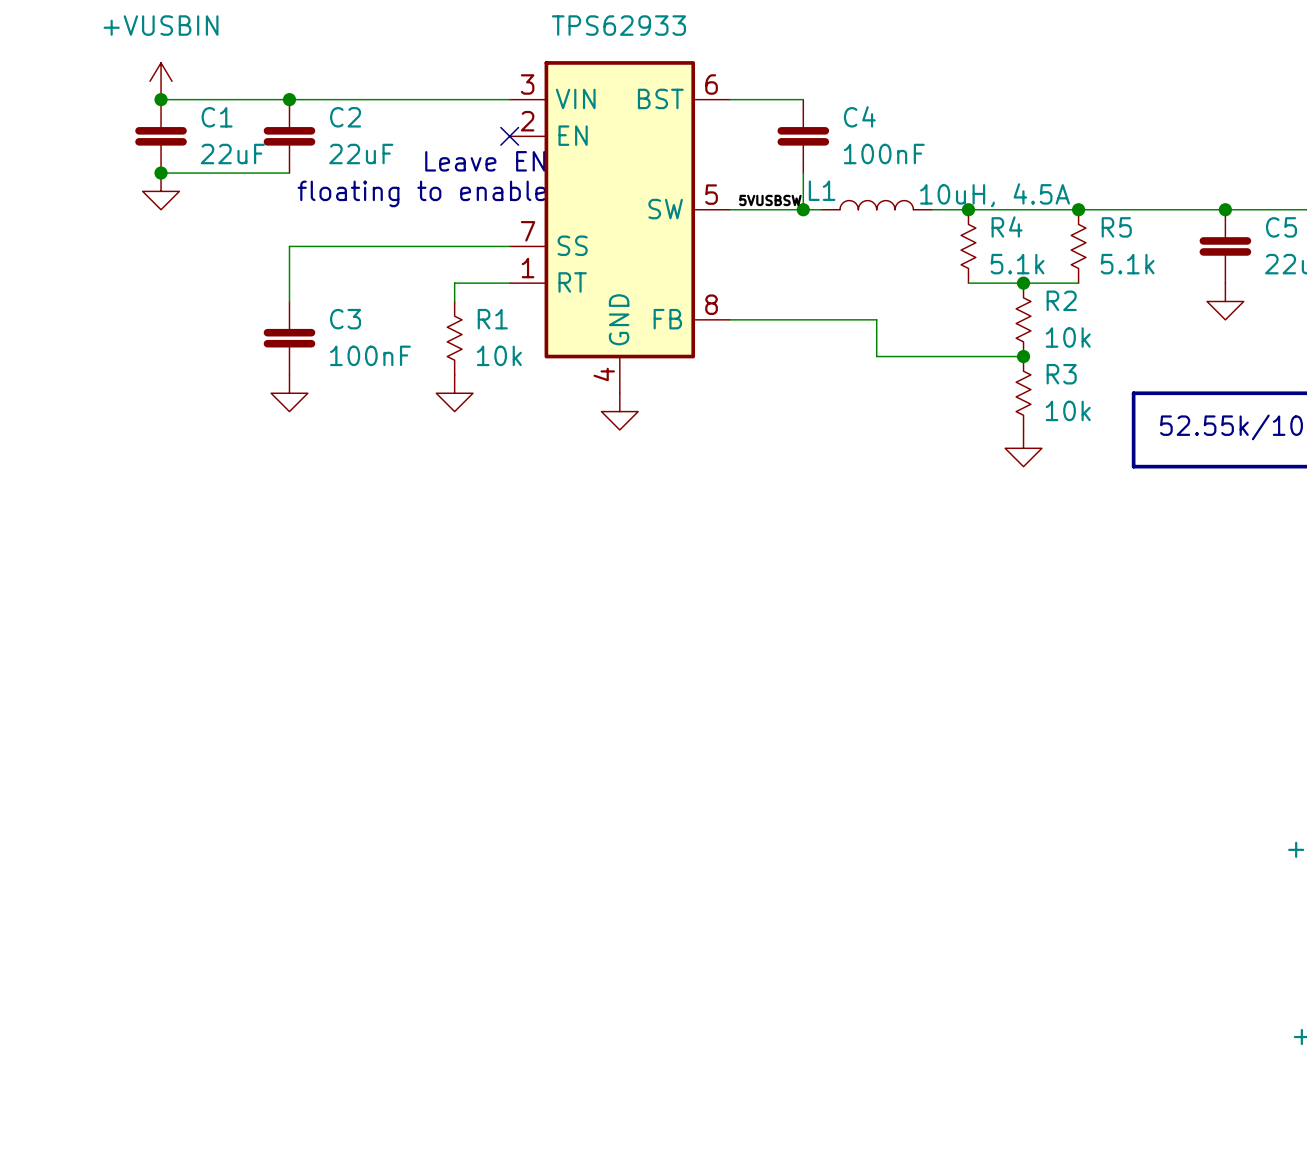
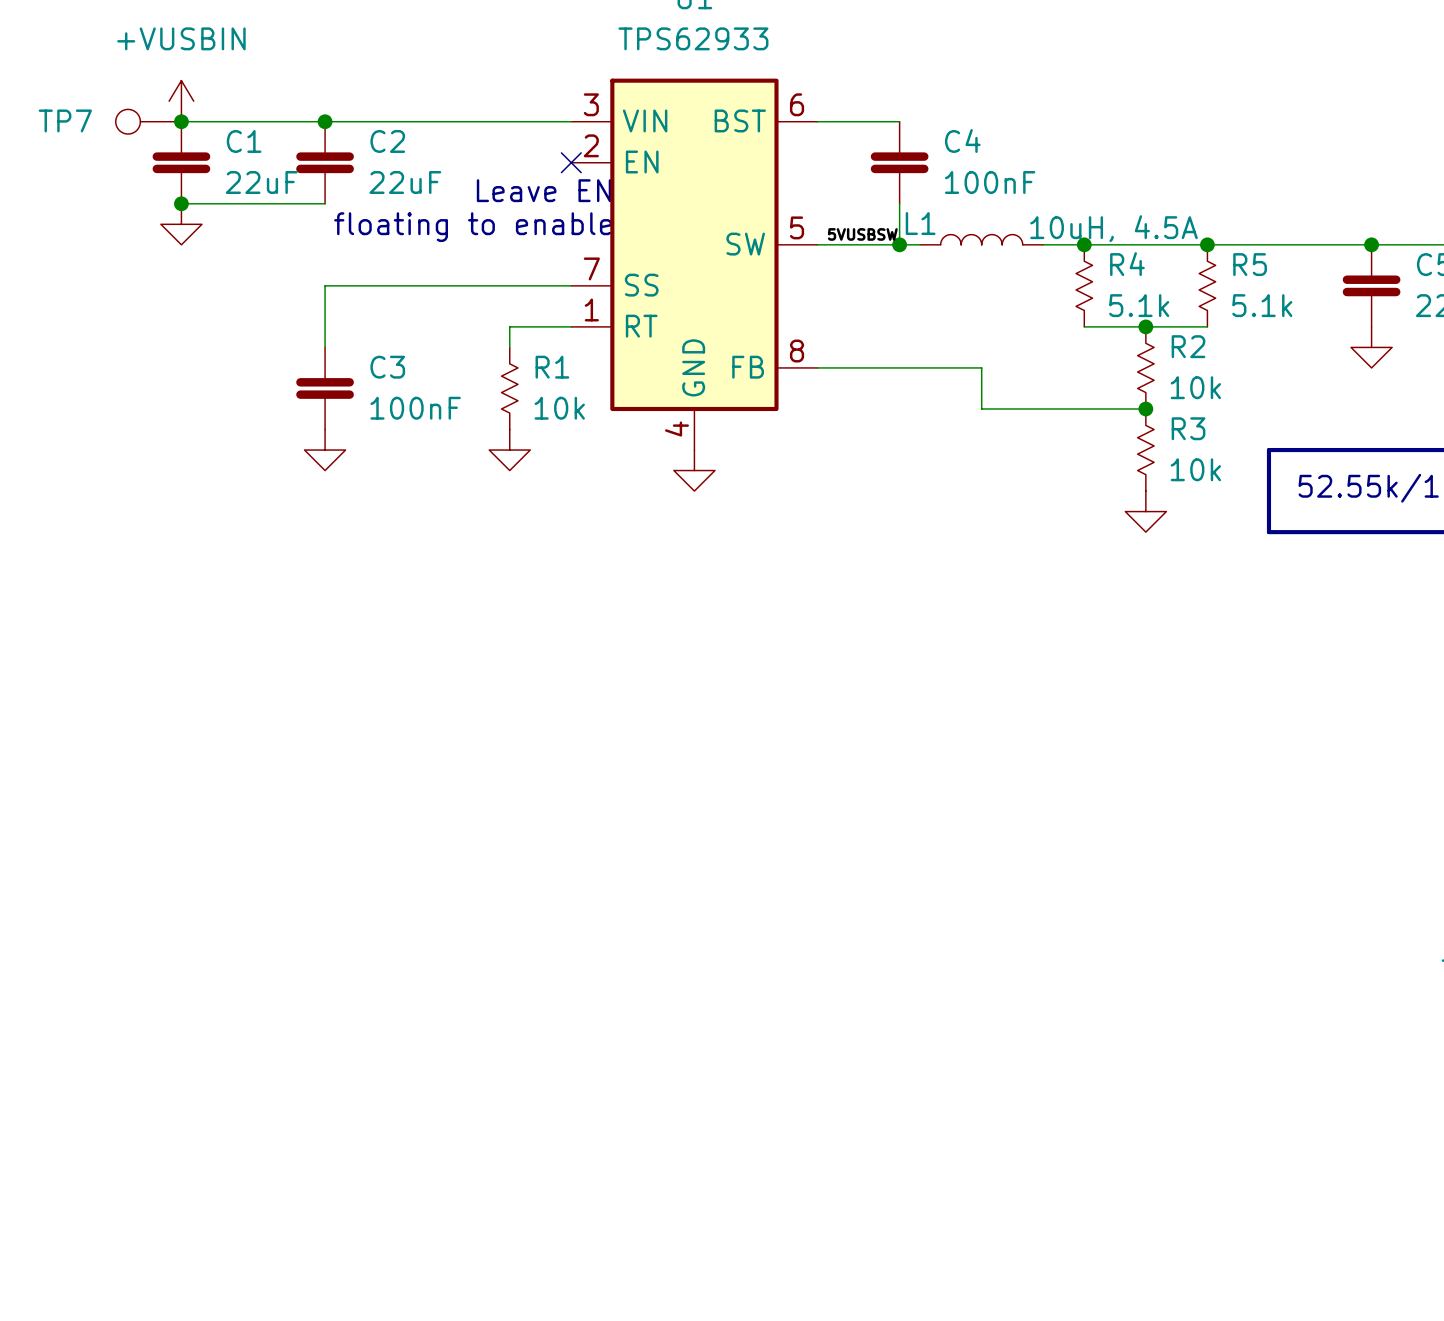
TP7: none -> (148, 121)

